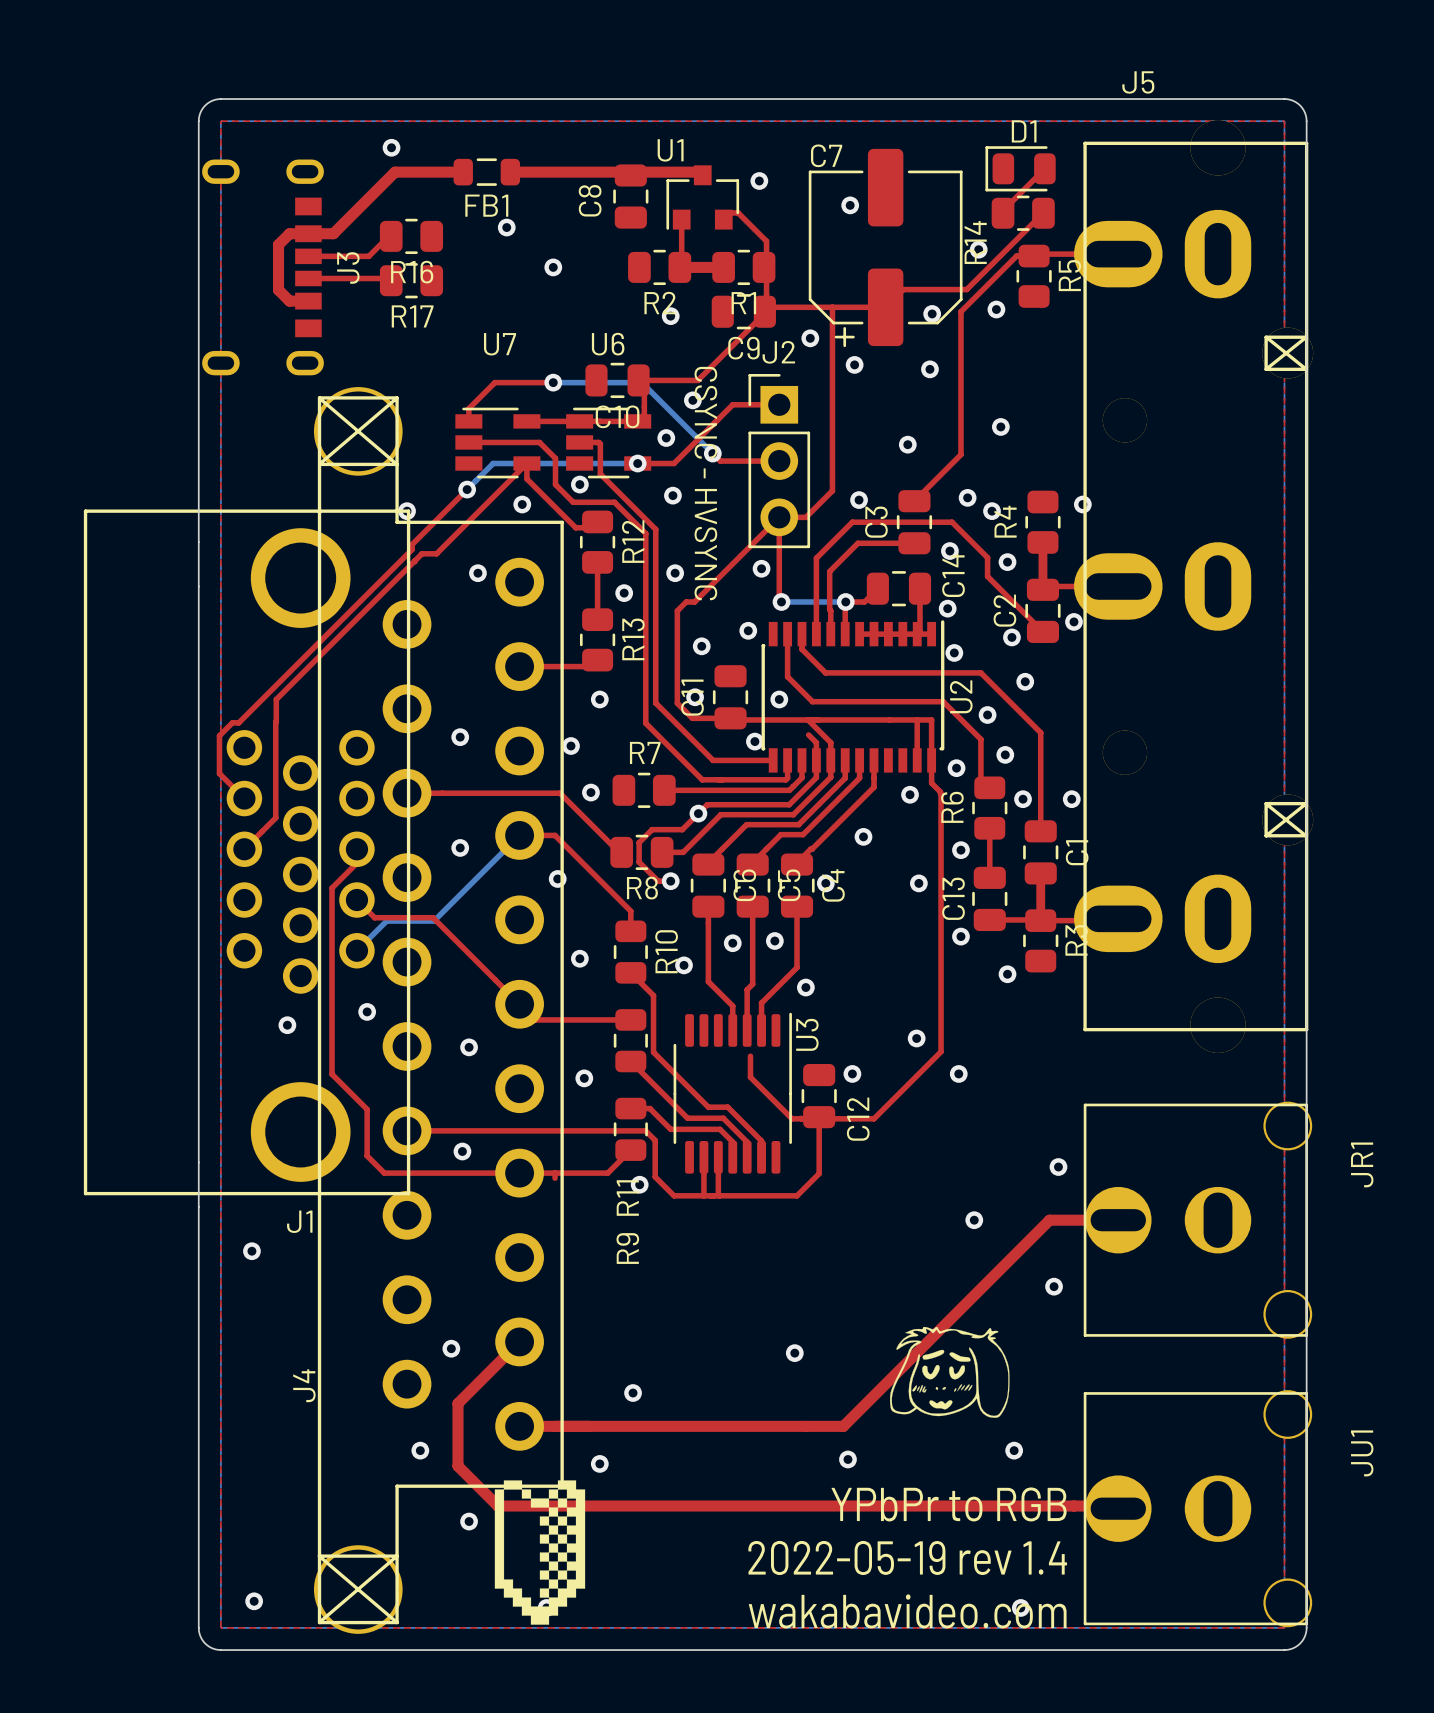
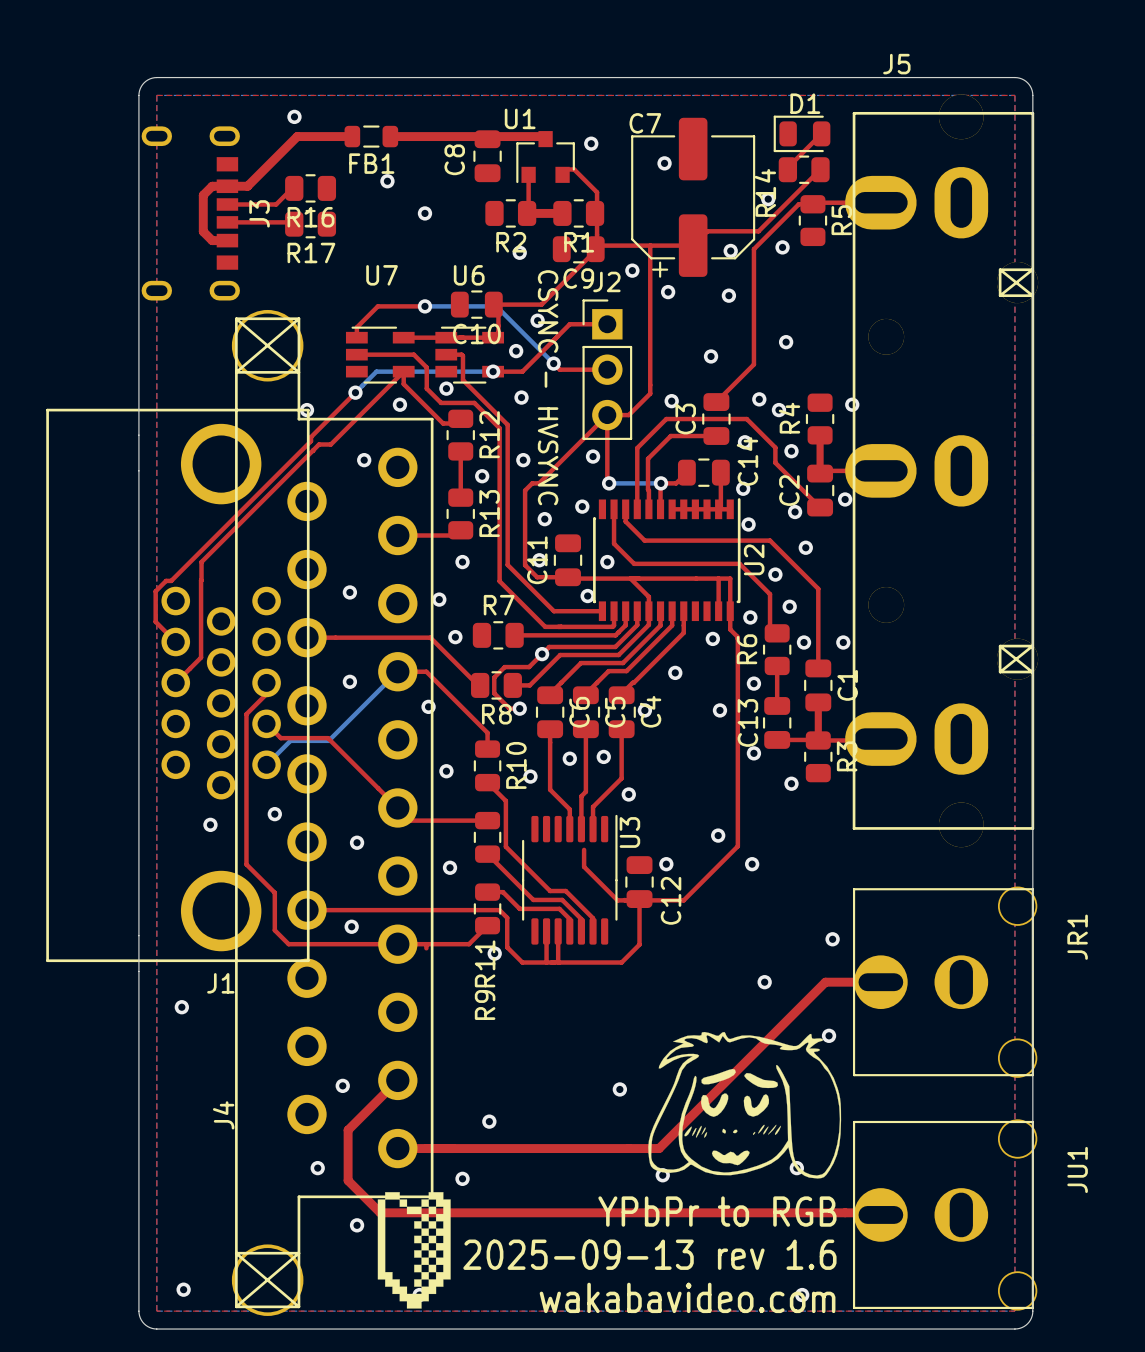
top track: (808, 734) (816, 742) (816, 760) -> none
drawing shape: [890, 1326, 1010, 1418] -> [648, 1031, 842, 1179]
text: 2022-05-19 rev 1.4 (907, 1557) -> 2025-09-13 rev 1.6 (649, 1254)

